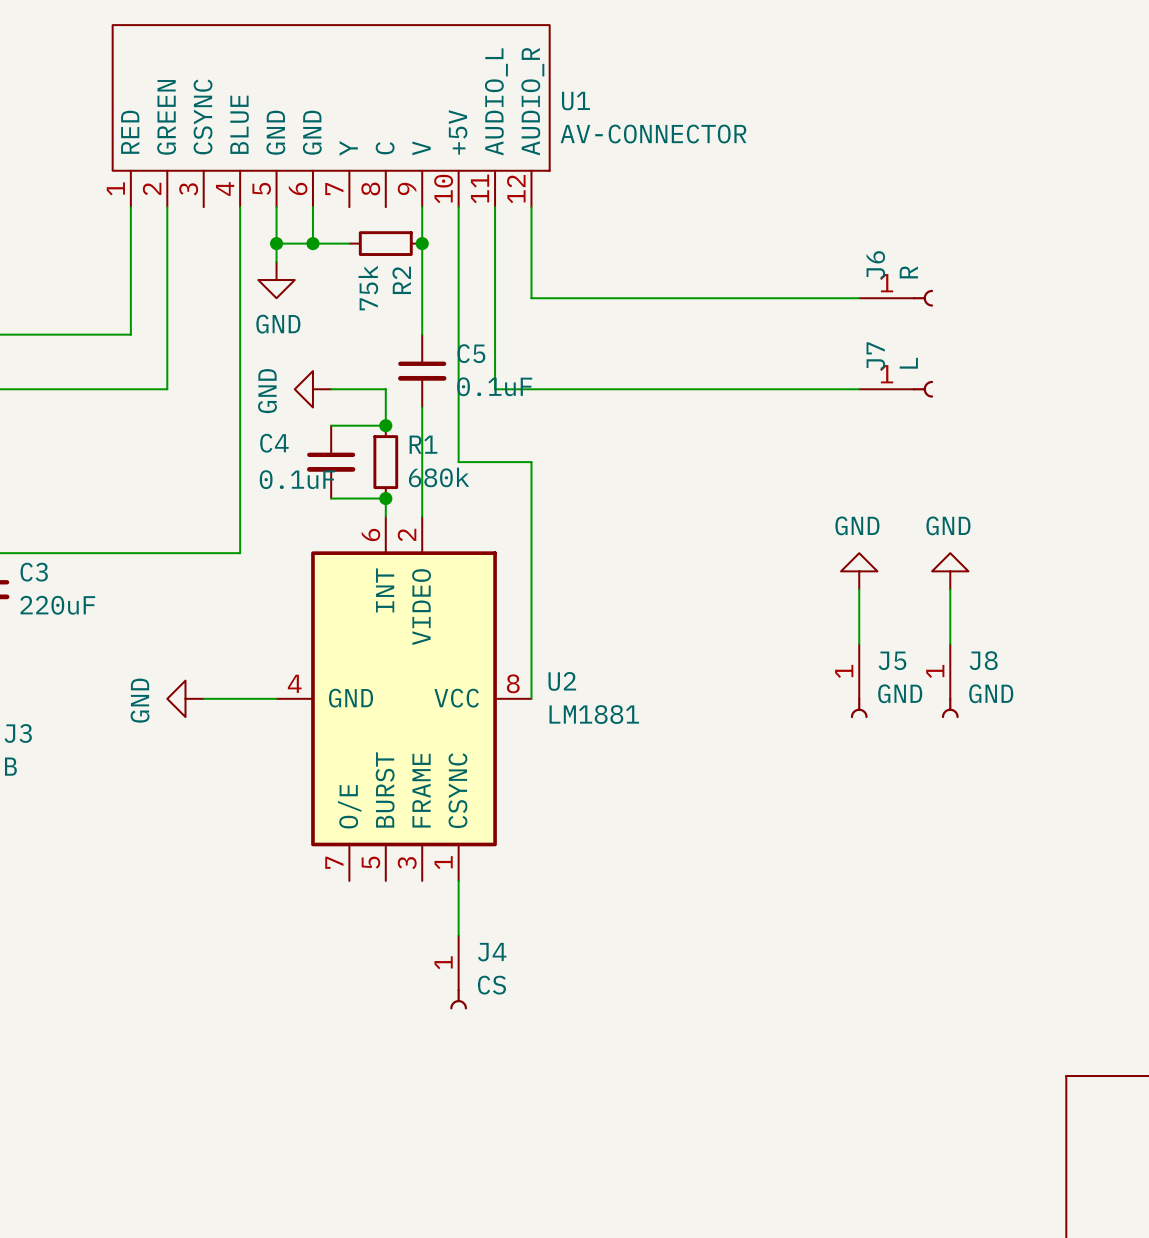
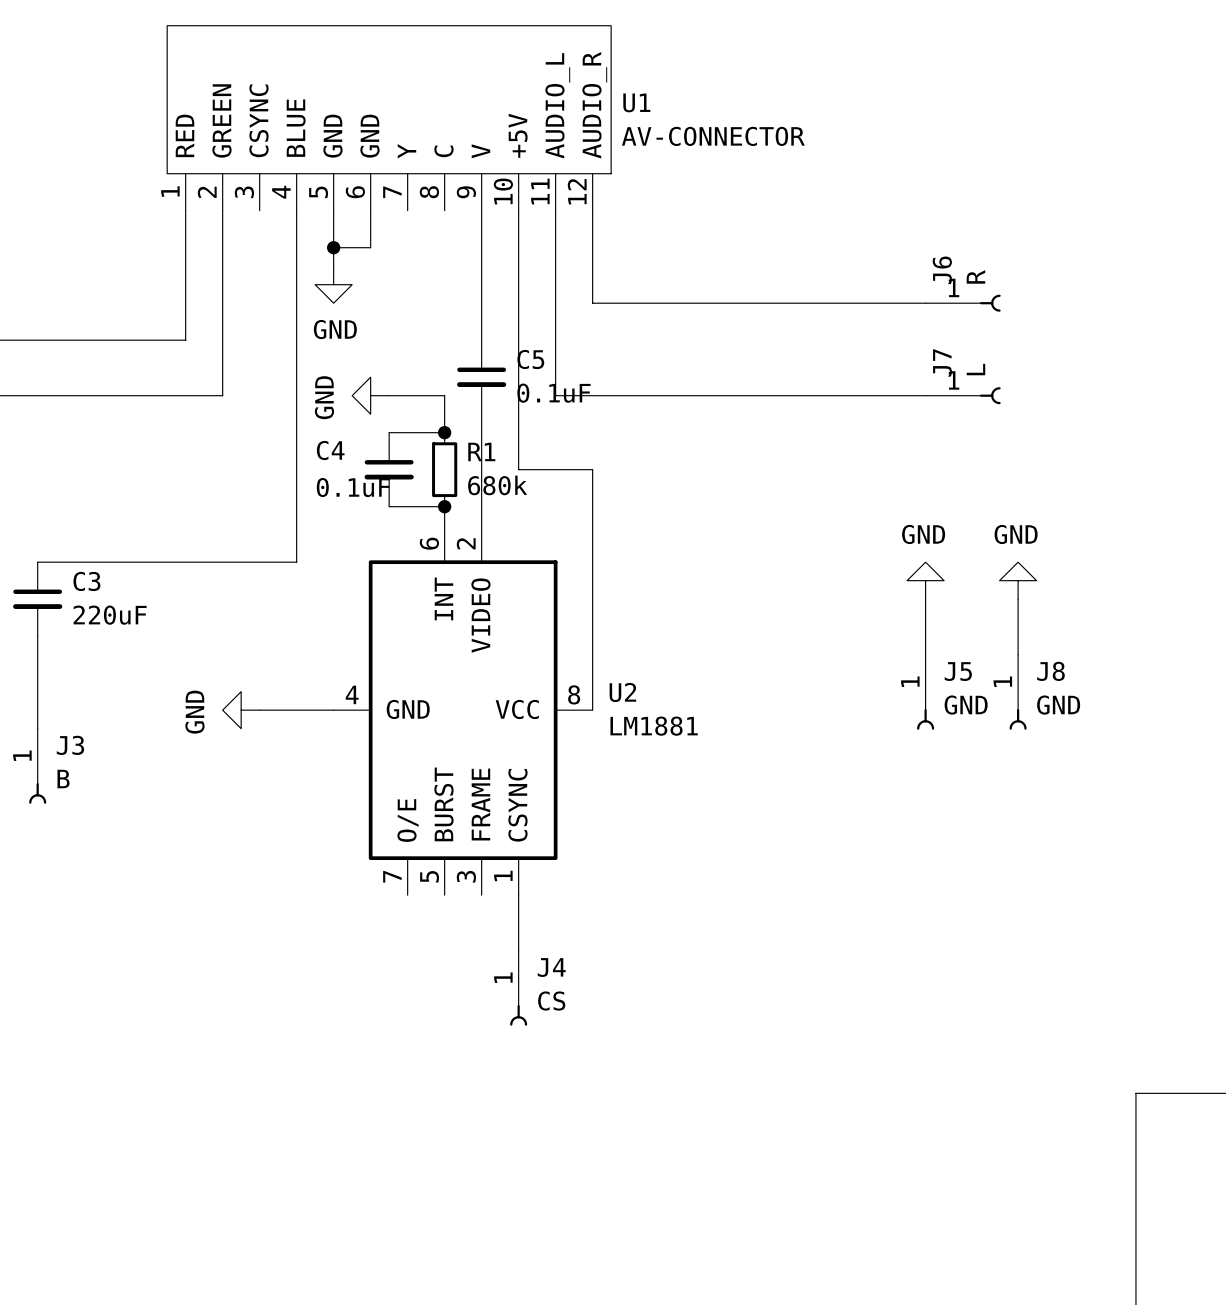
wire: (312, 243) (349, 243) -> none
junction: (312, 243) -> none
R2: 75k (385, 243) -> none
junction: (422, 243) -> none

